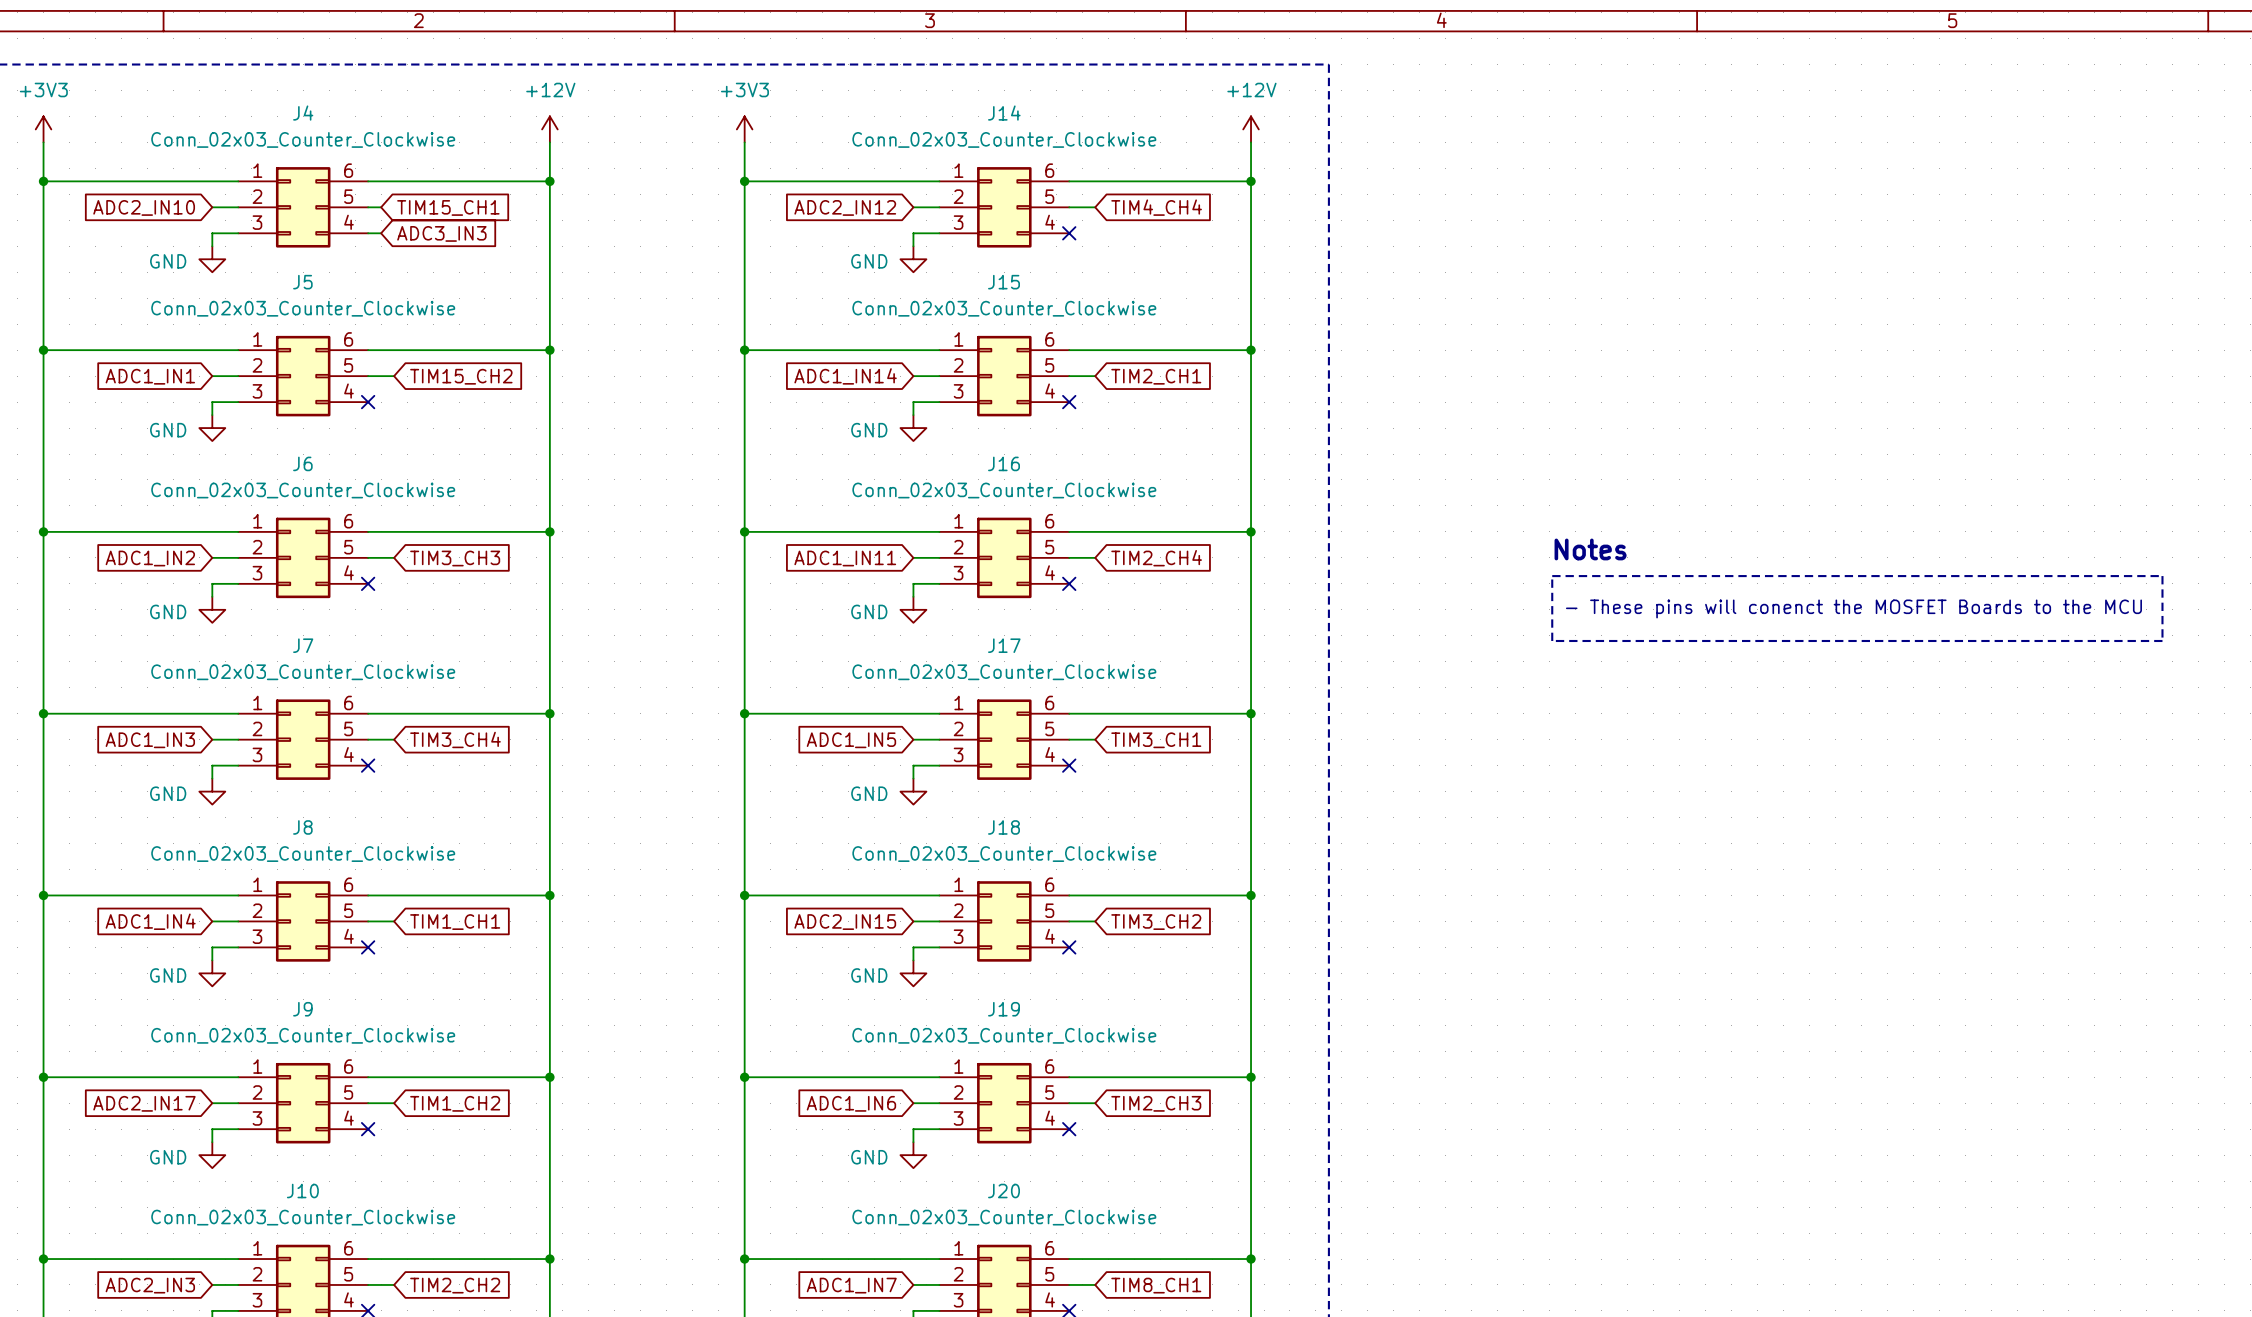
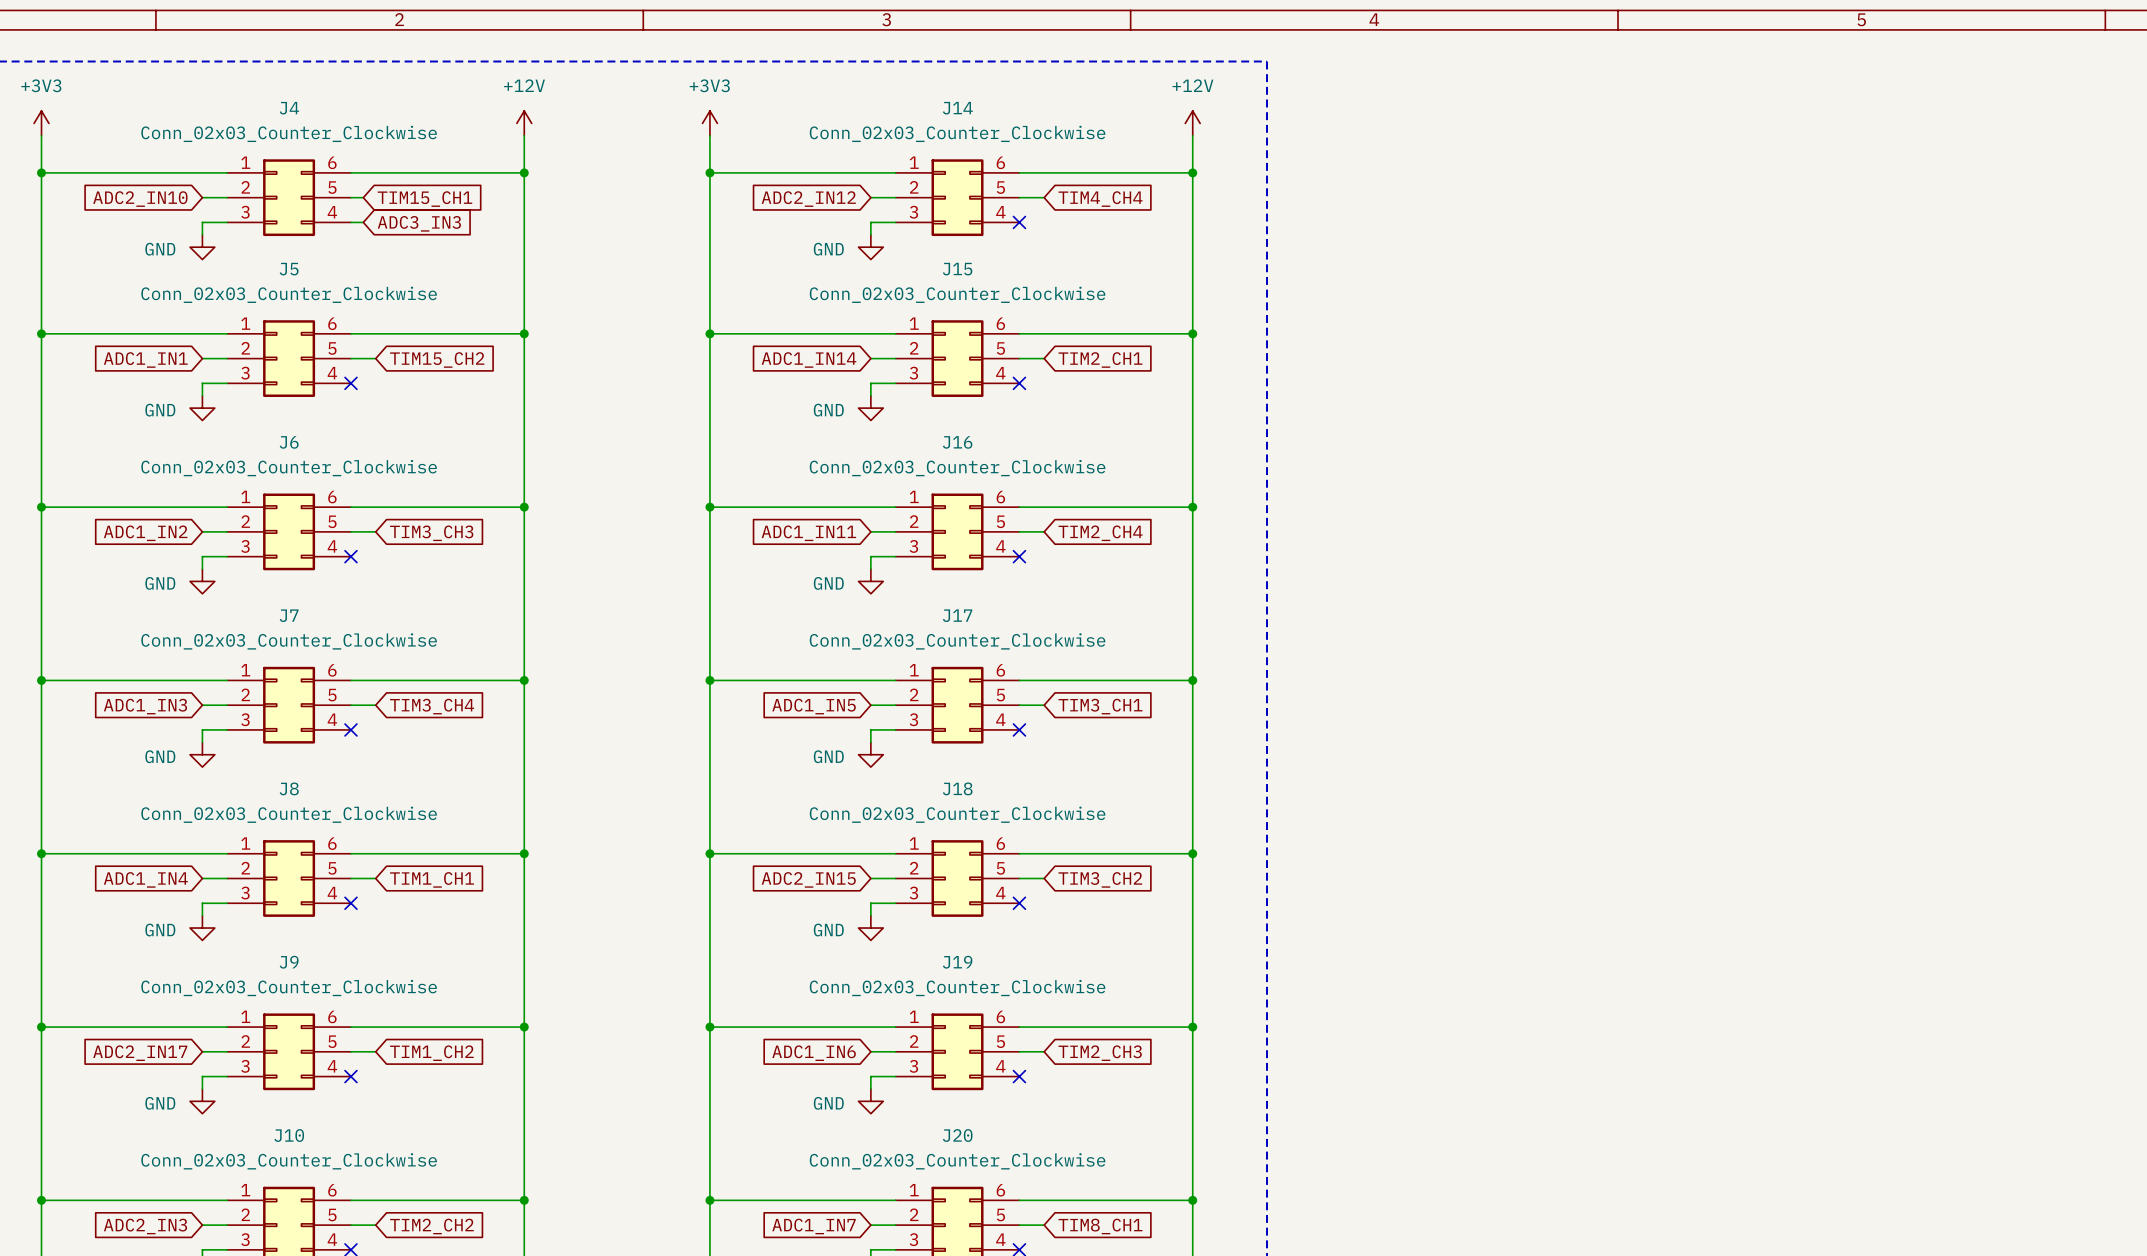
text: Notes (1590, 549) -> none
line: (1552, 576) (2162, 576) (2162, 640) (1552, 640) (1552, 576) -> none
text: - These pins will conenct the MOSFET Boards to the MCU (1853, 608) -> none

